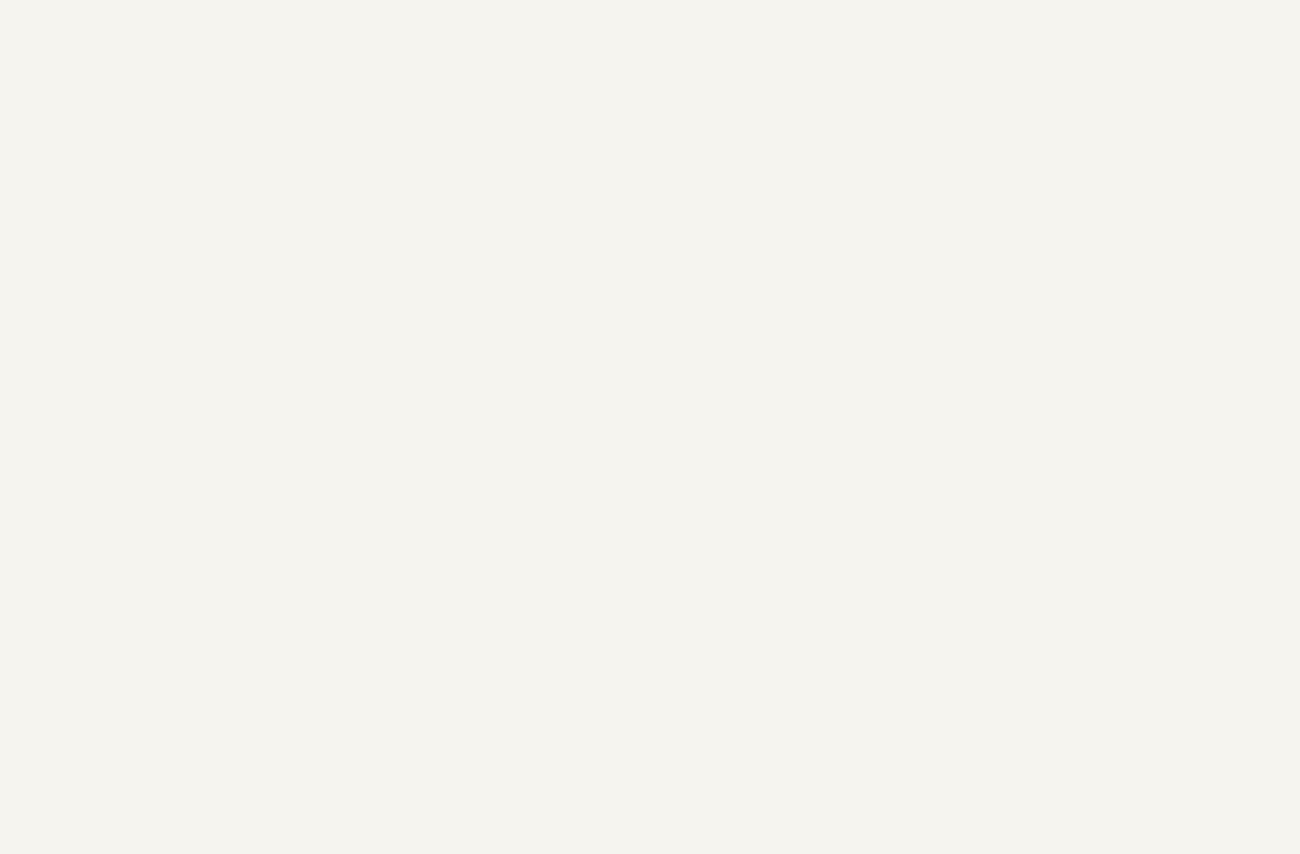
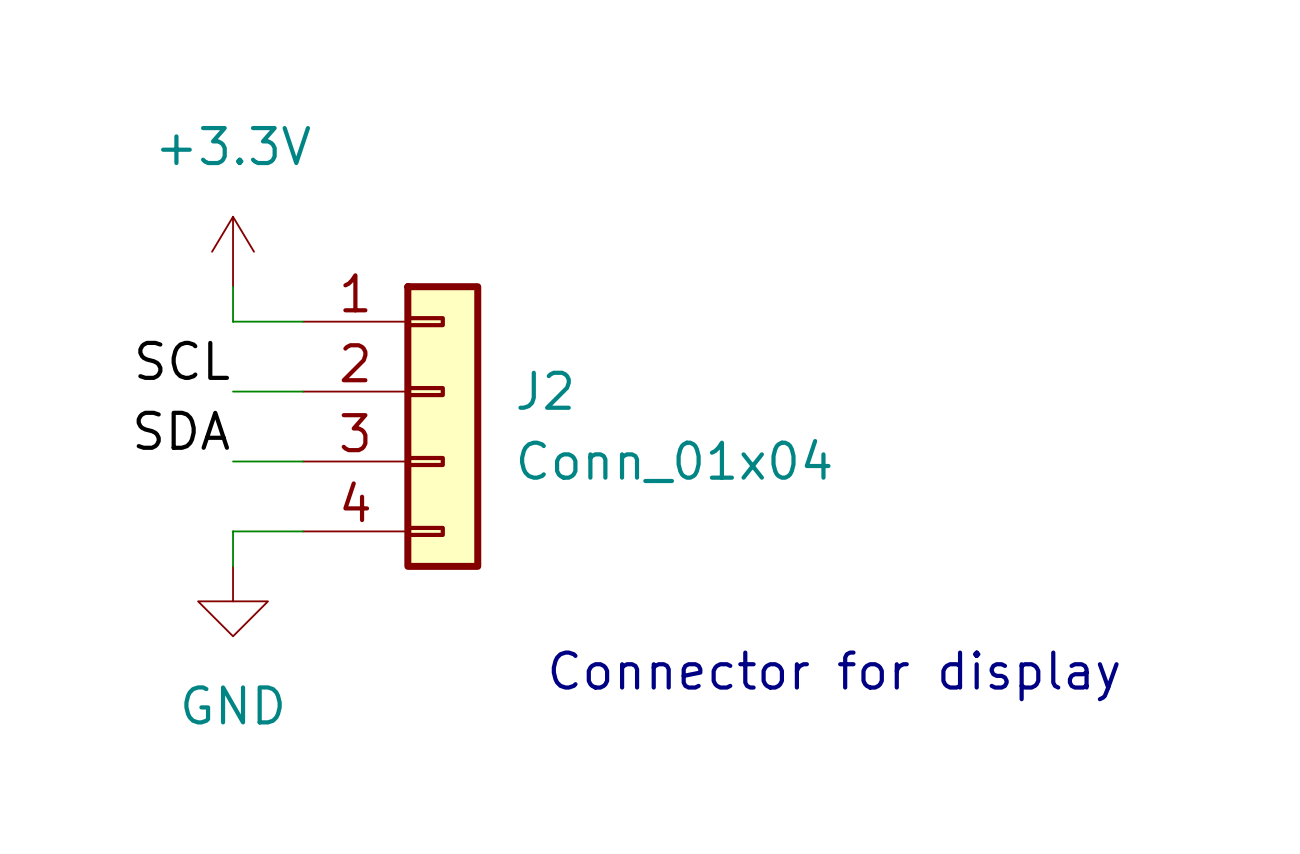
power symbol: none -> +3.3V (233, 251)
wire: none -> (233, 286) (233, 321) (302, 321)
label: none -> SCL (183, 360)
wire: none -> (233, 391) (302, 391)
J2: none -> Conn_01x04 (392, 426)
label: none -> SDA (182, 430)
wire: none -> (233, 461) (302, 461)
wire: none -> (302, 531) (233, 531) (233, 566)
power symbol: none -> GND (233, 601)
text: none -> Connector for display (835, 675)

